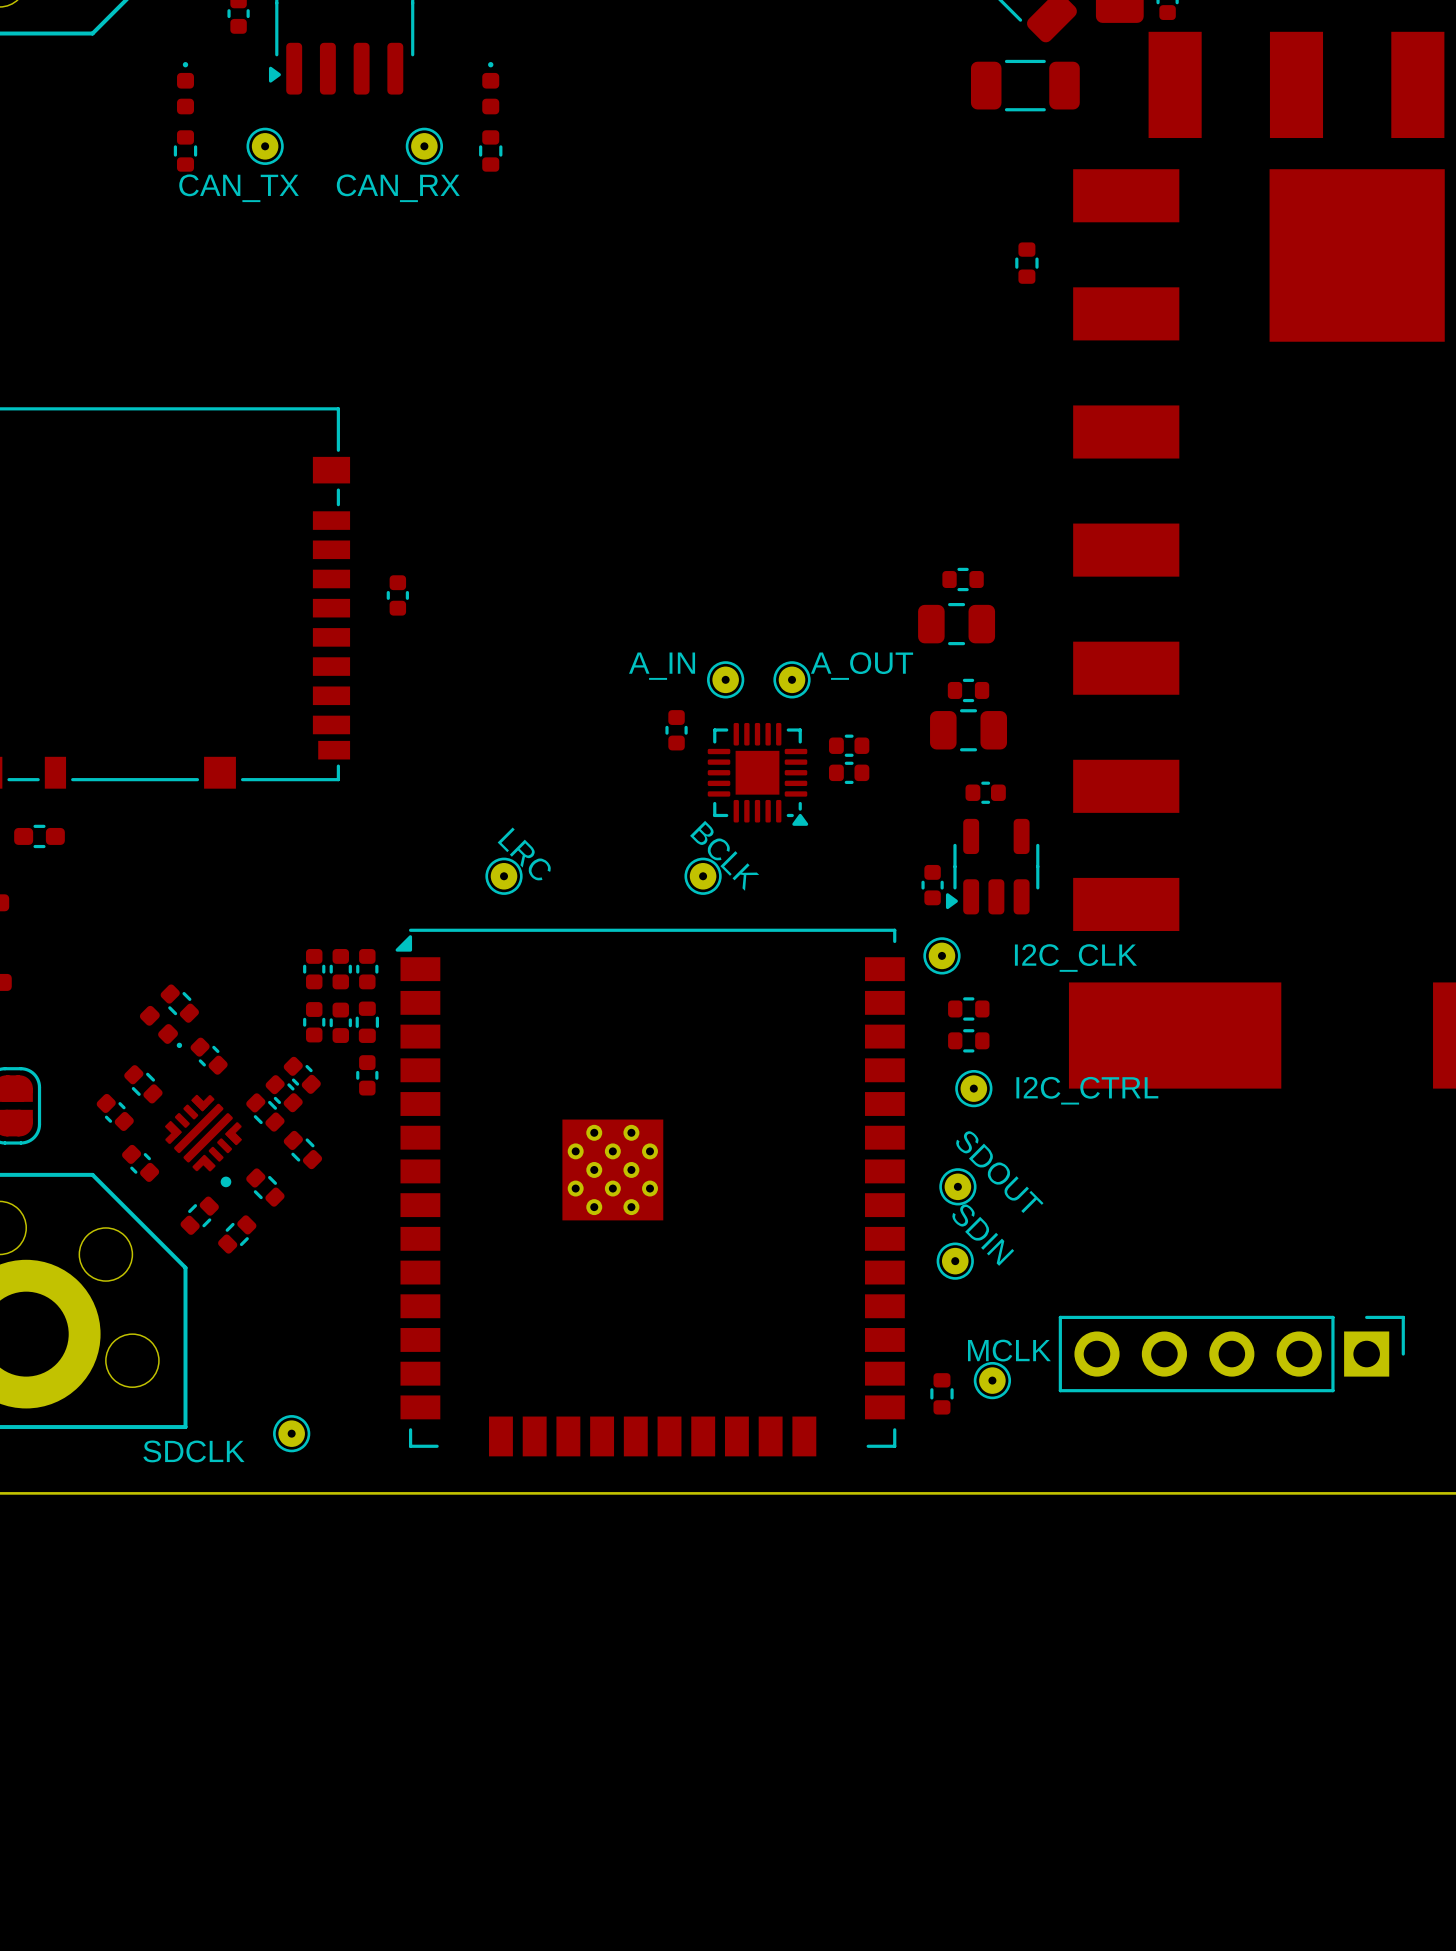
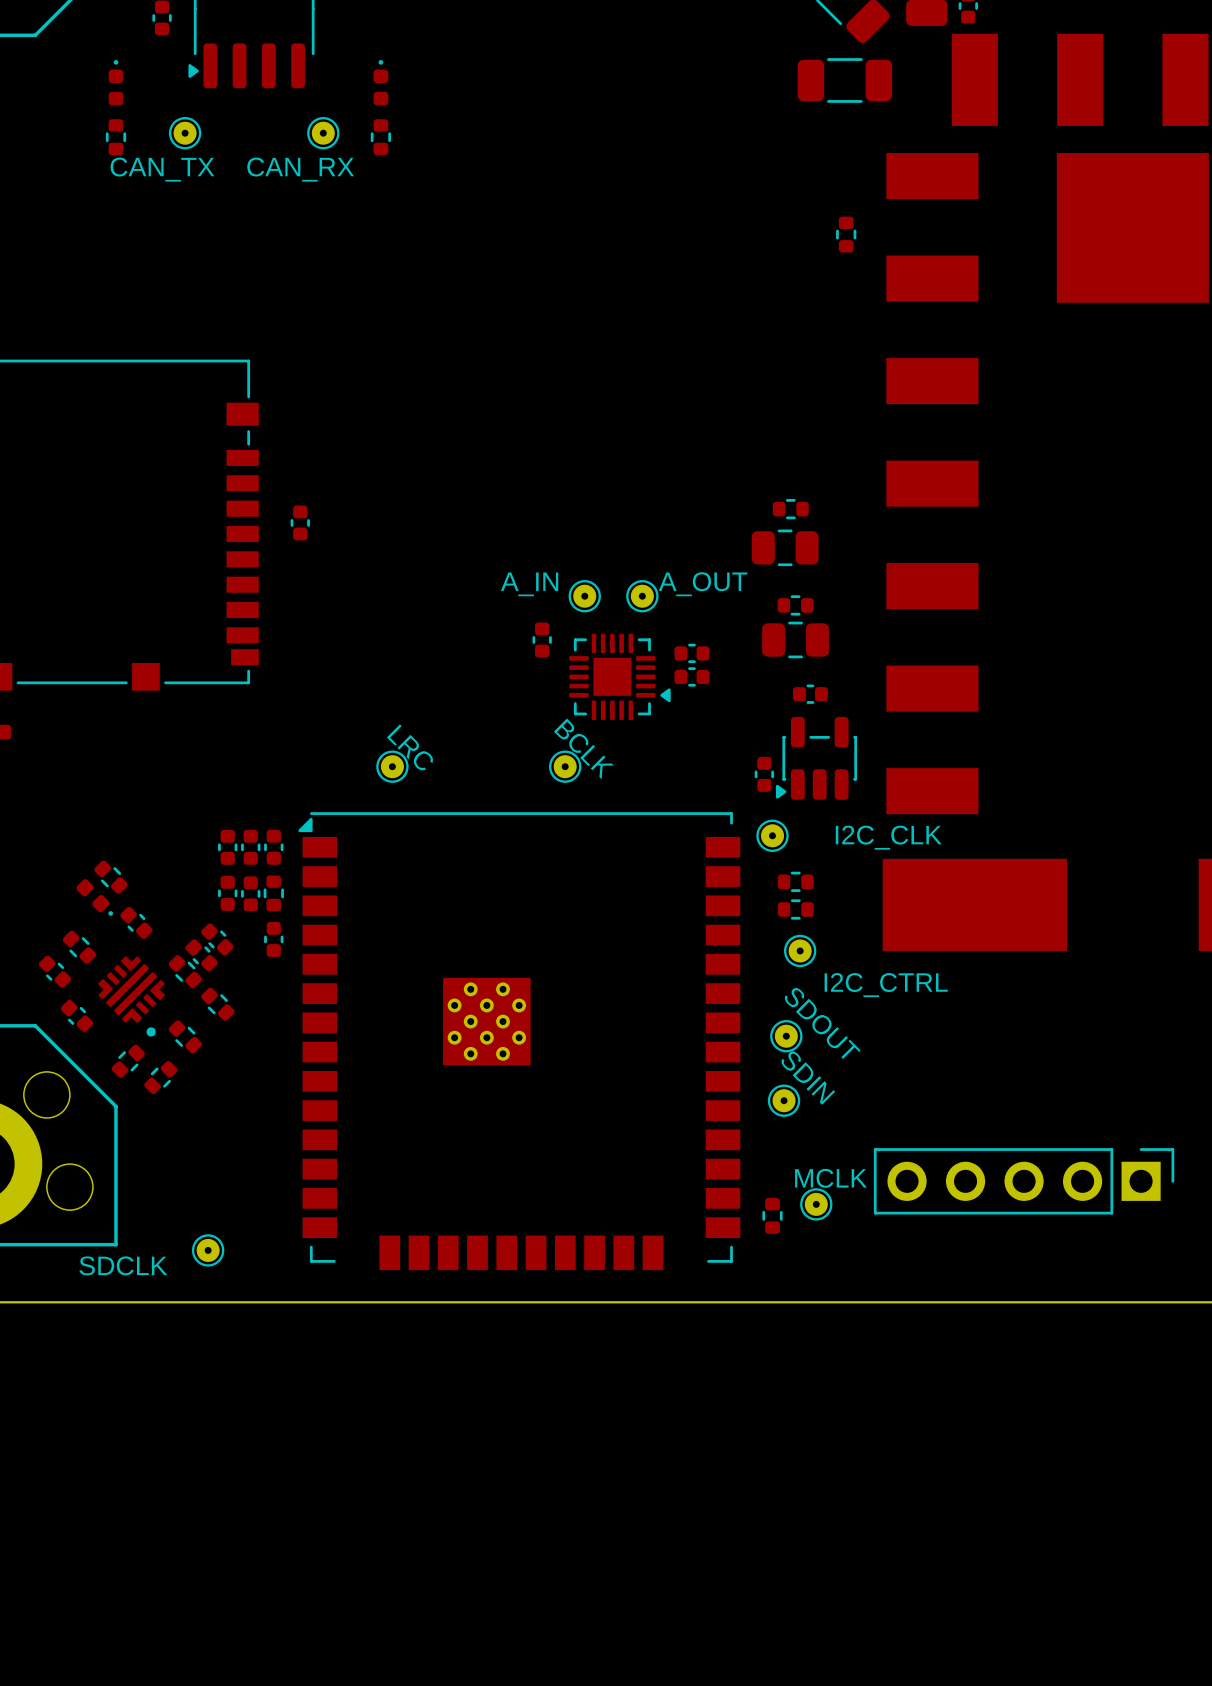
part footprint: [707, 722, 809, 826] -> [569, 633, 671, 721]
part footprint: [945, 818, 1040, 915] -> [775, 716, 858, 800]
part value position: I2C_CTRL (1087, 1090) -> I2C_CTRL (886, 985)

